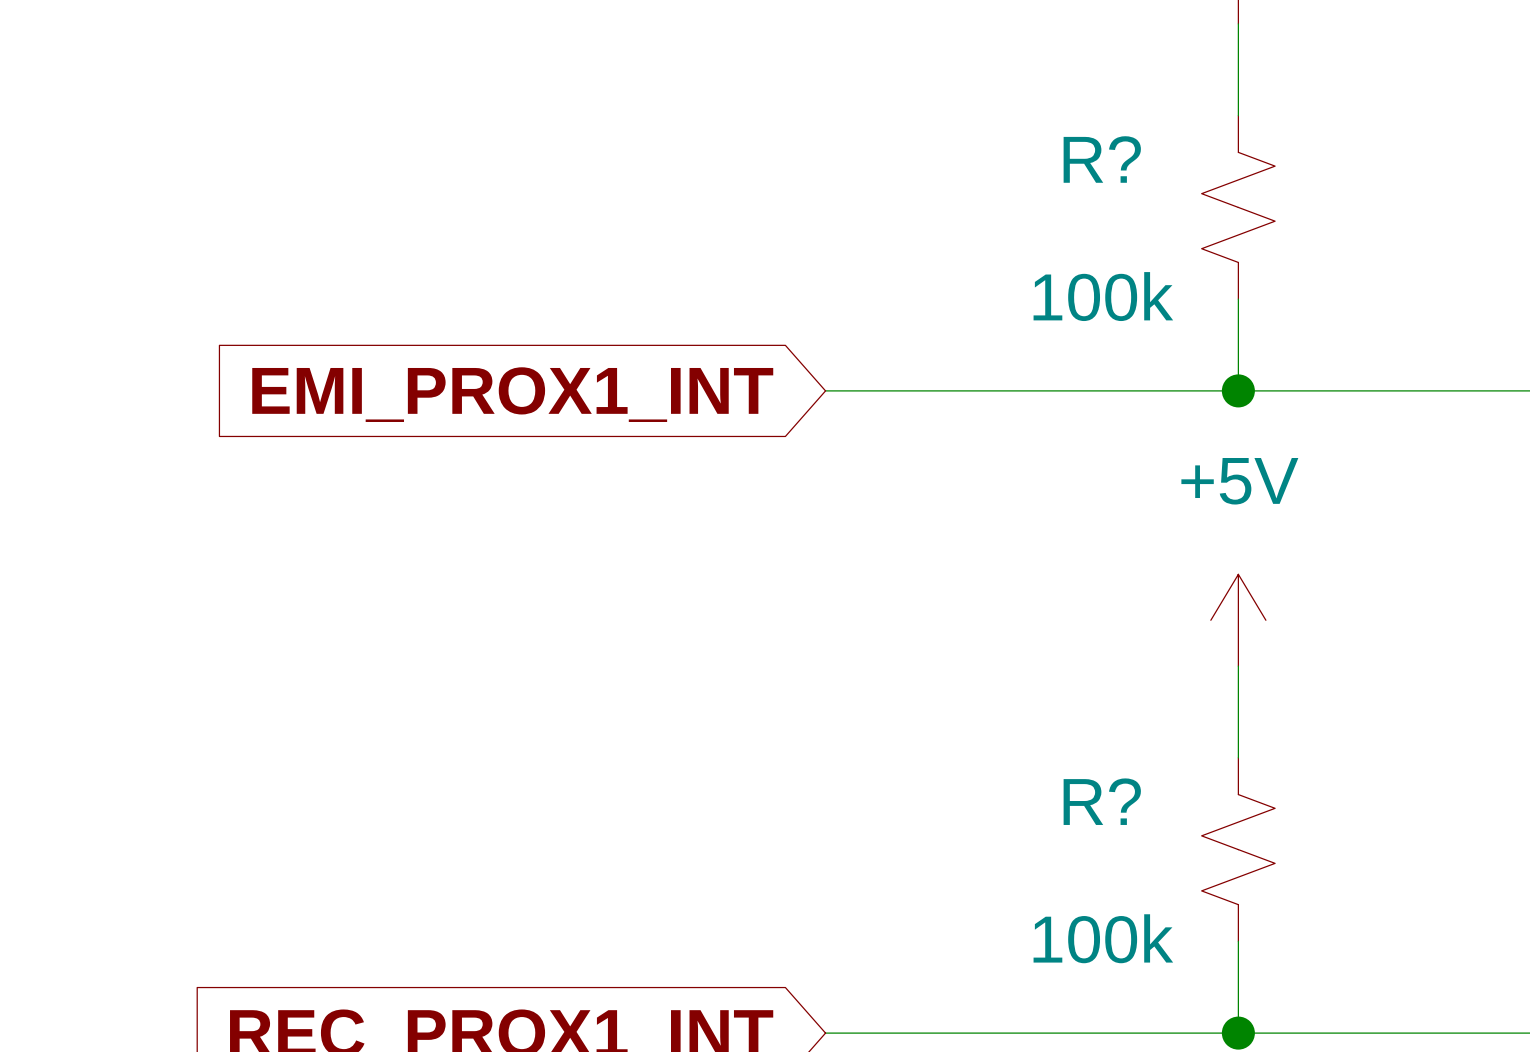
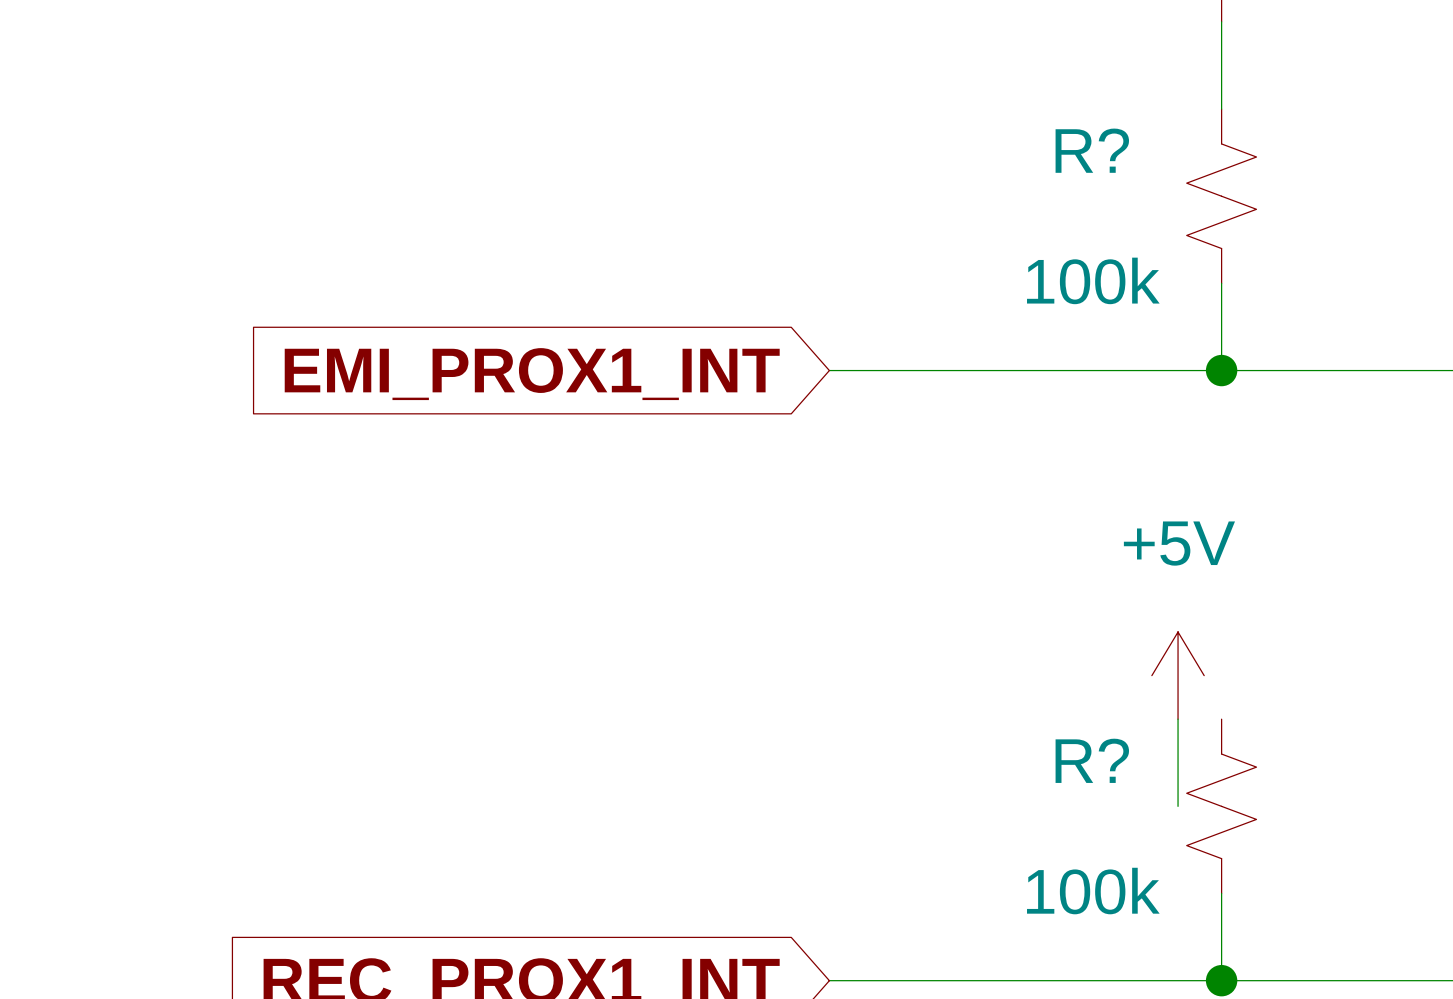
power symbol position: +5V (1238, 620) -> +5V (1178, 675)
wire: (1238, 666) (1238, 757) -> (1178, 719) (1178, 806)

